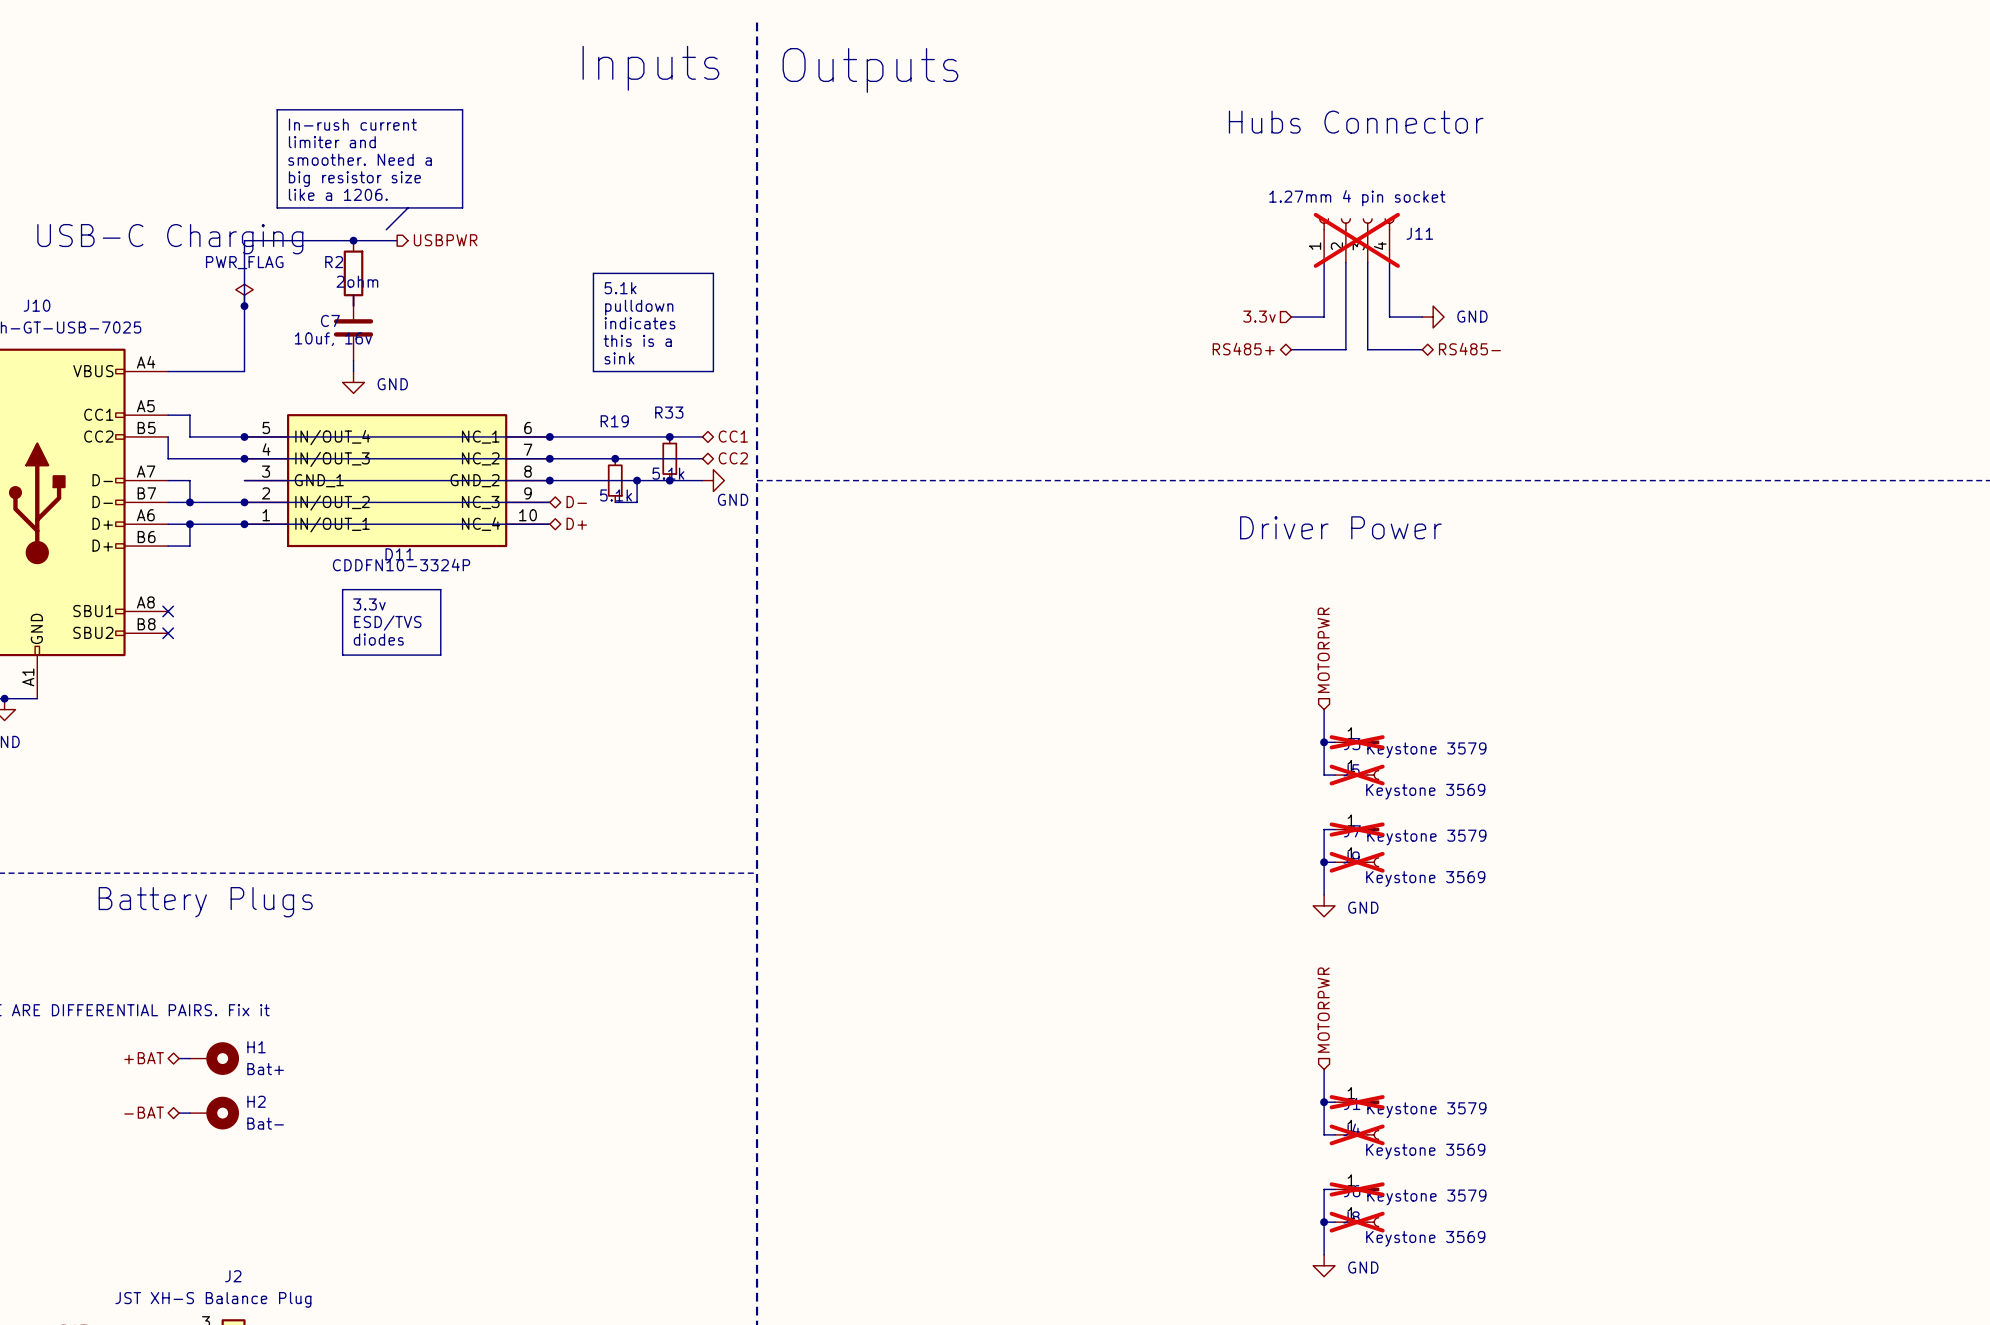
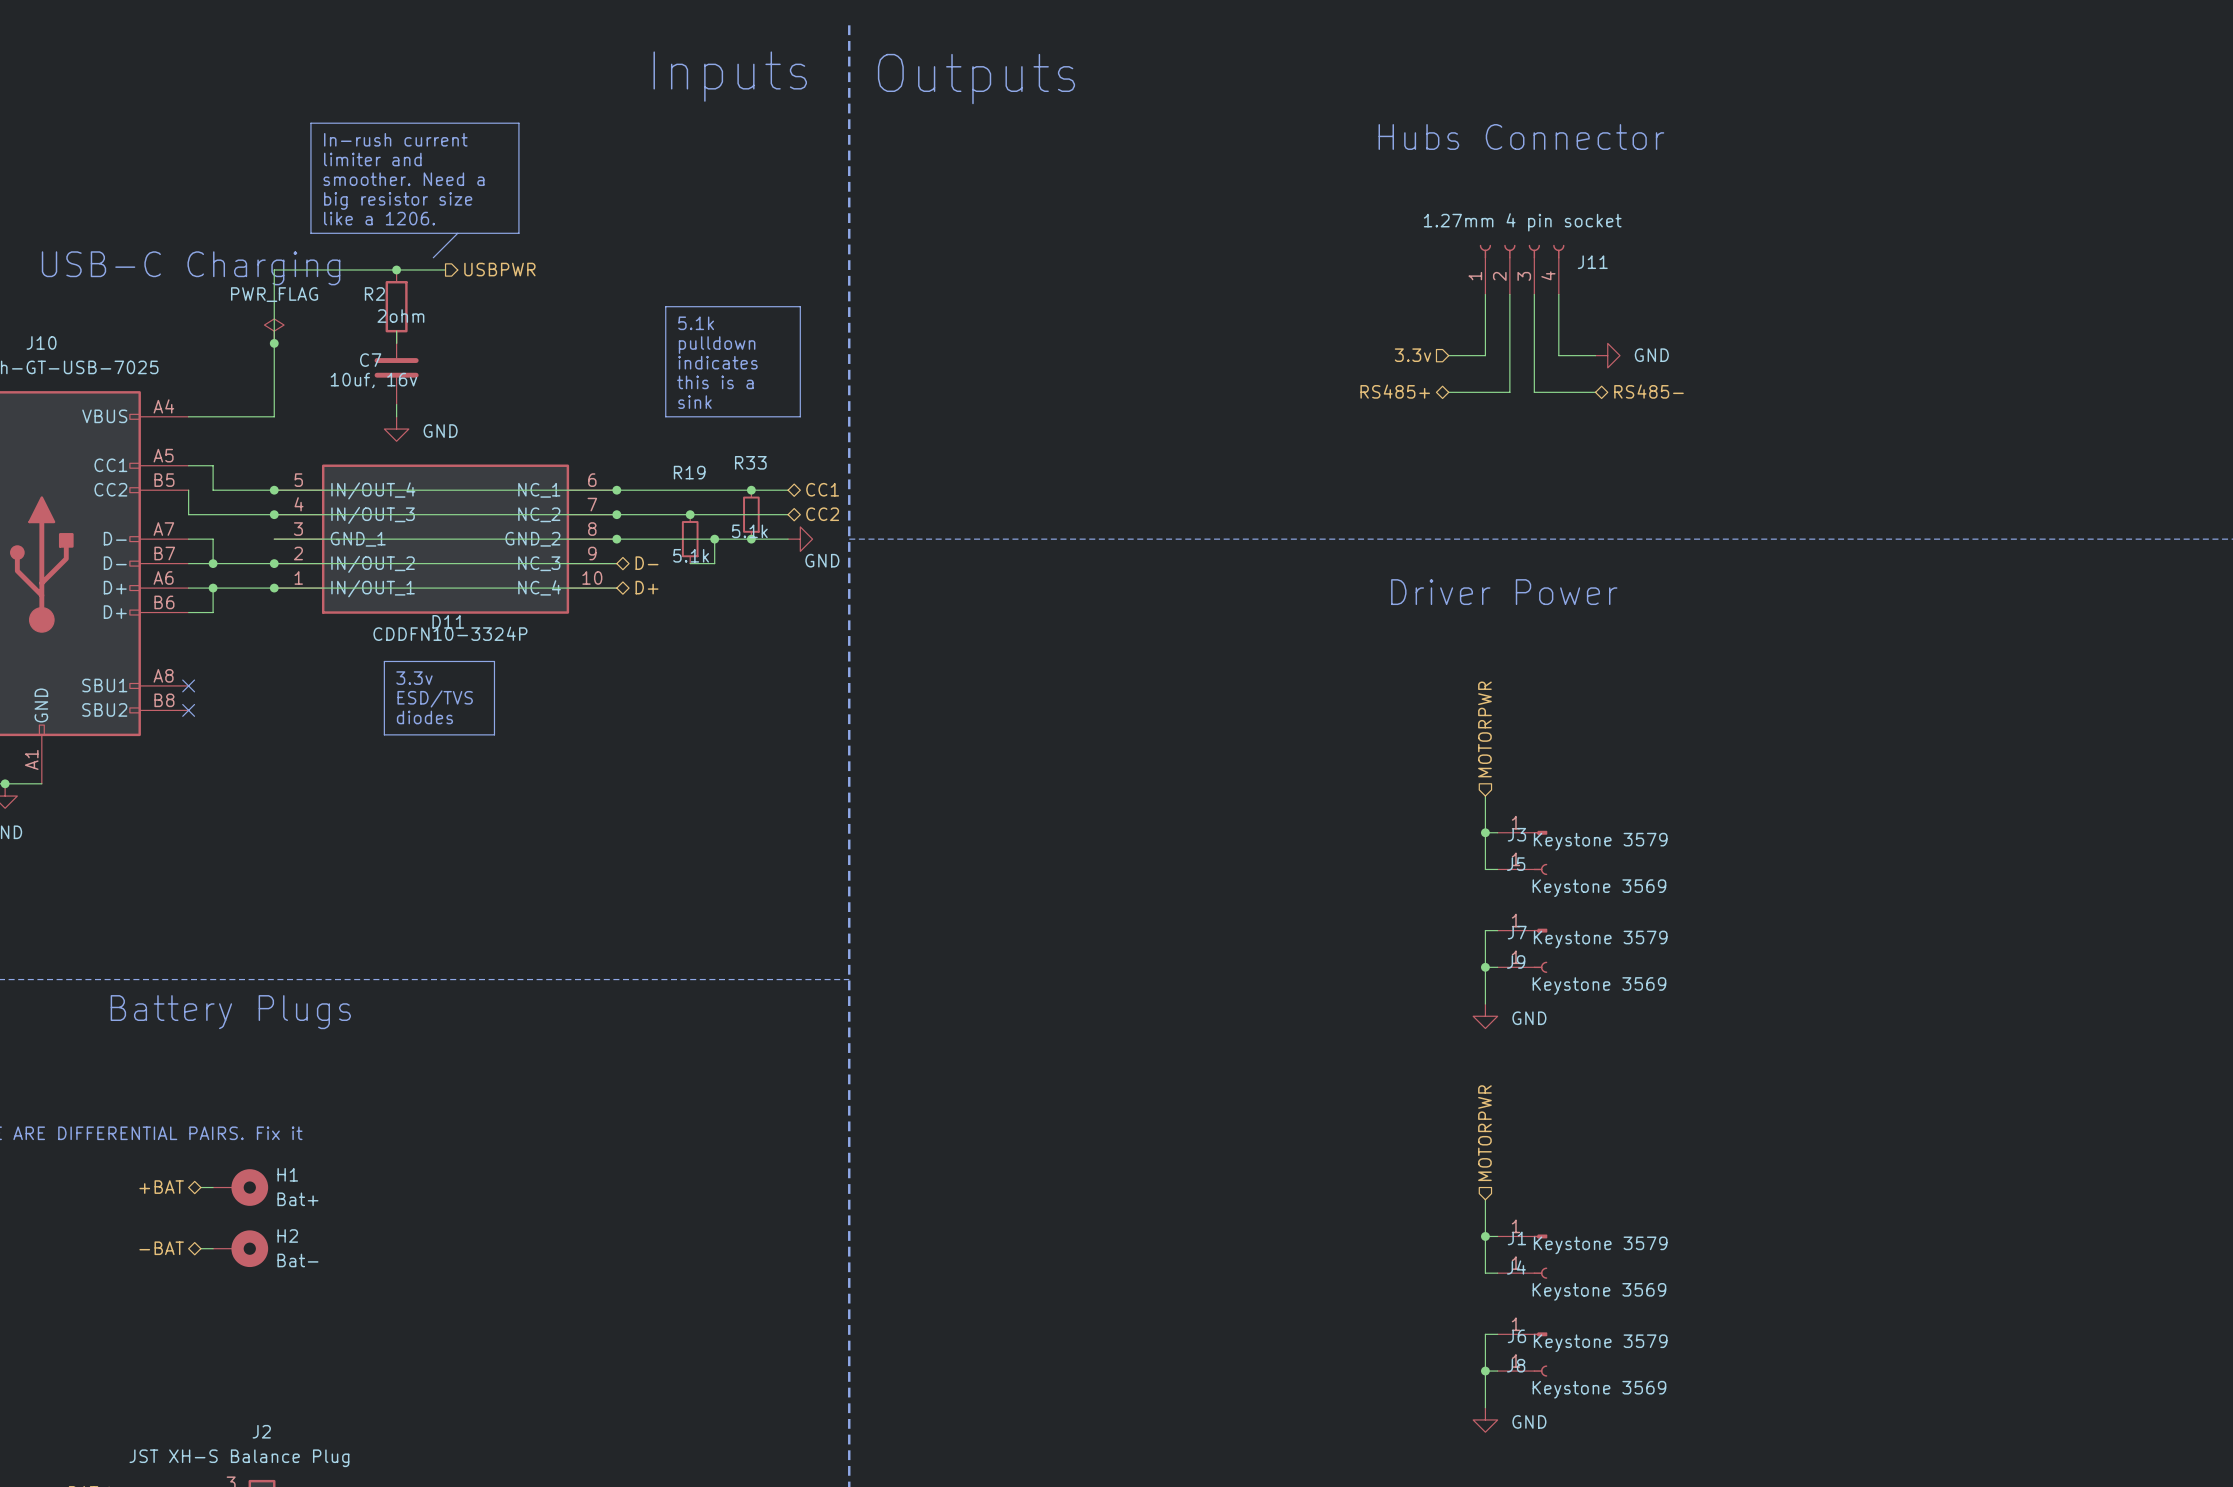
J11 do-not-place cross: (1356, 240) -> none
J3 do-not-place cross: (1357, 742) -> none
J5 do-not-place cross: (1357, 775) -> none
J7 do-not-place cross: (1357, 829) -> none
J9 do-not-place cross: (1357, 862) -> none
J1 do-not-place cross: (1357, 1102) -> none
J4 do-not-place cross: (1357, 1134) -> none
J6 do-not-place cross: (1357, 1189) -> none
J8 do-not-place cross: (1357, 1222) -> none

